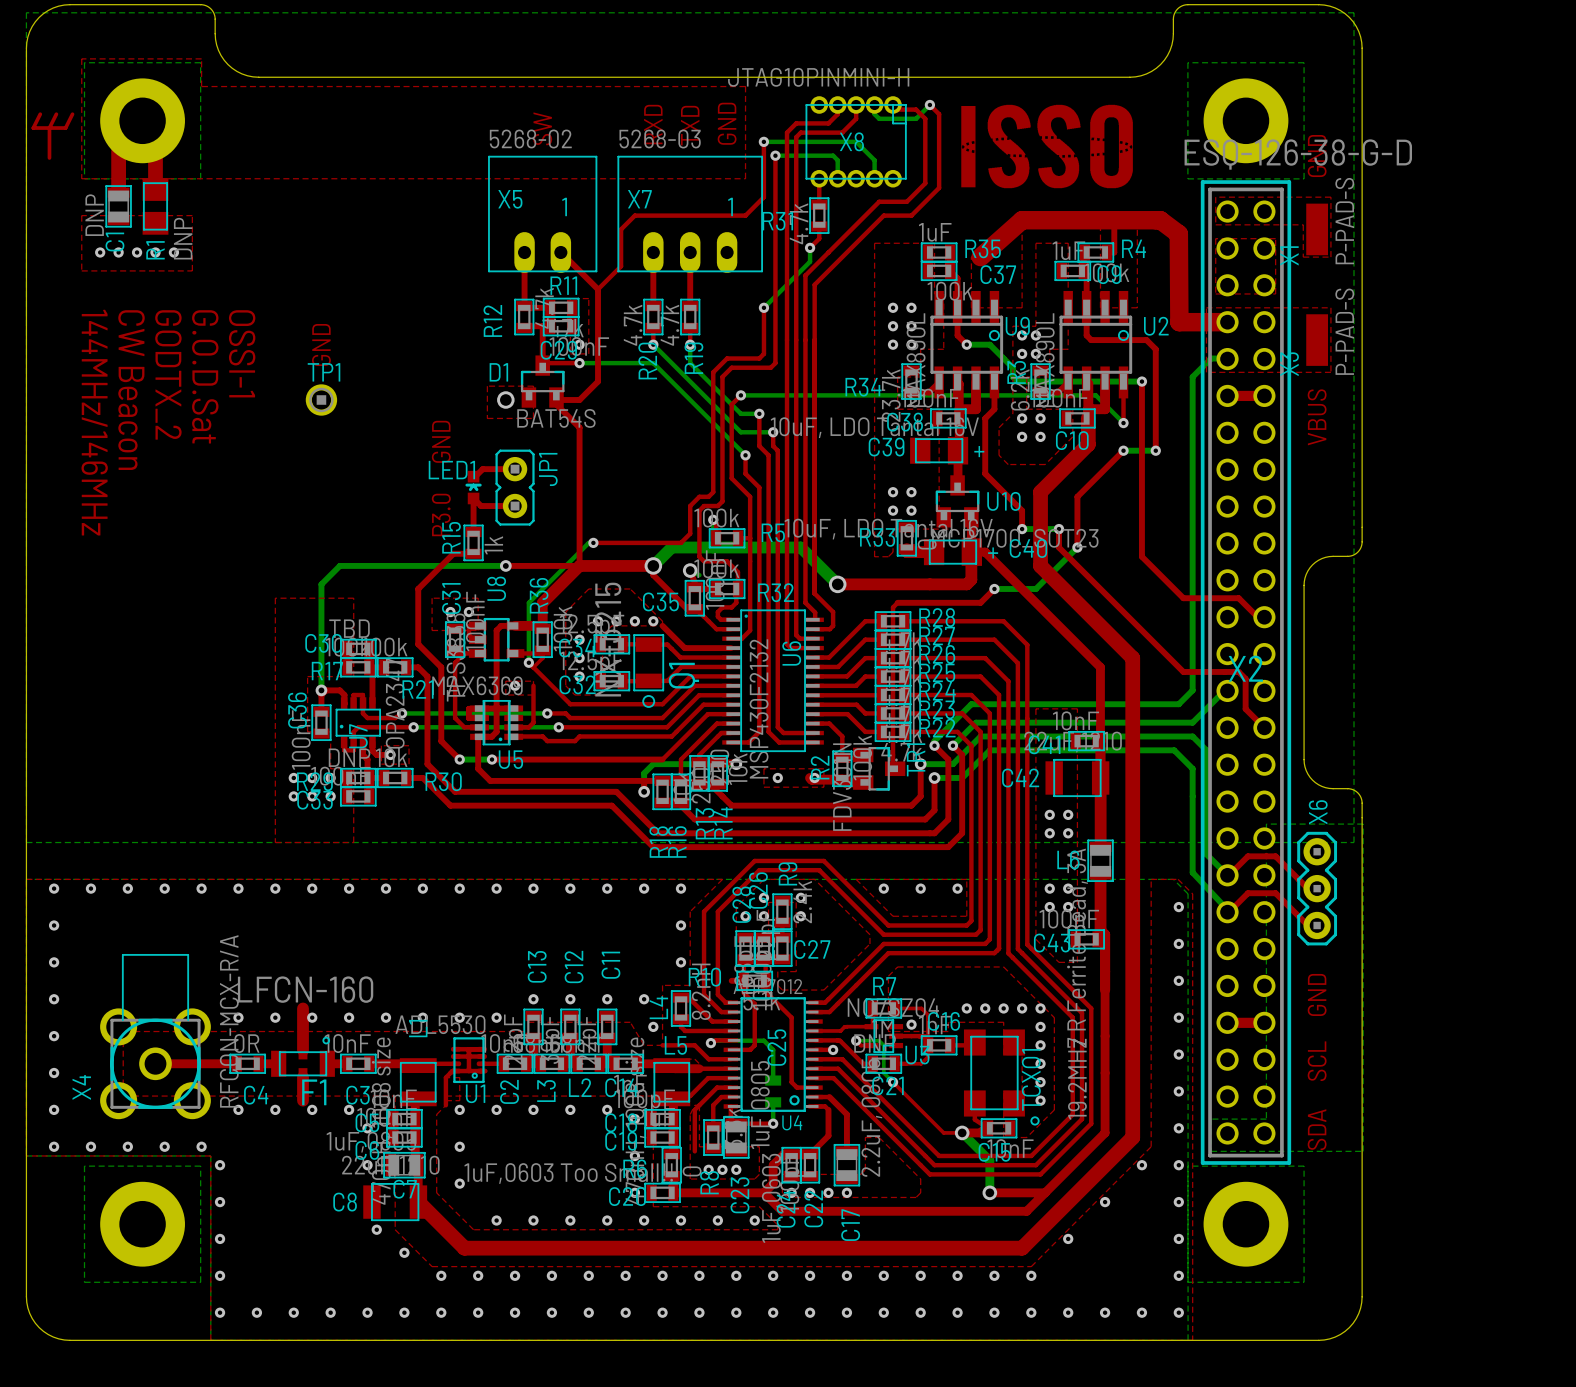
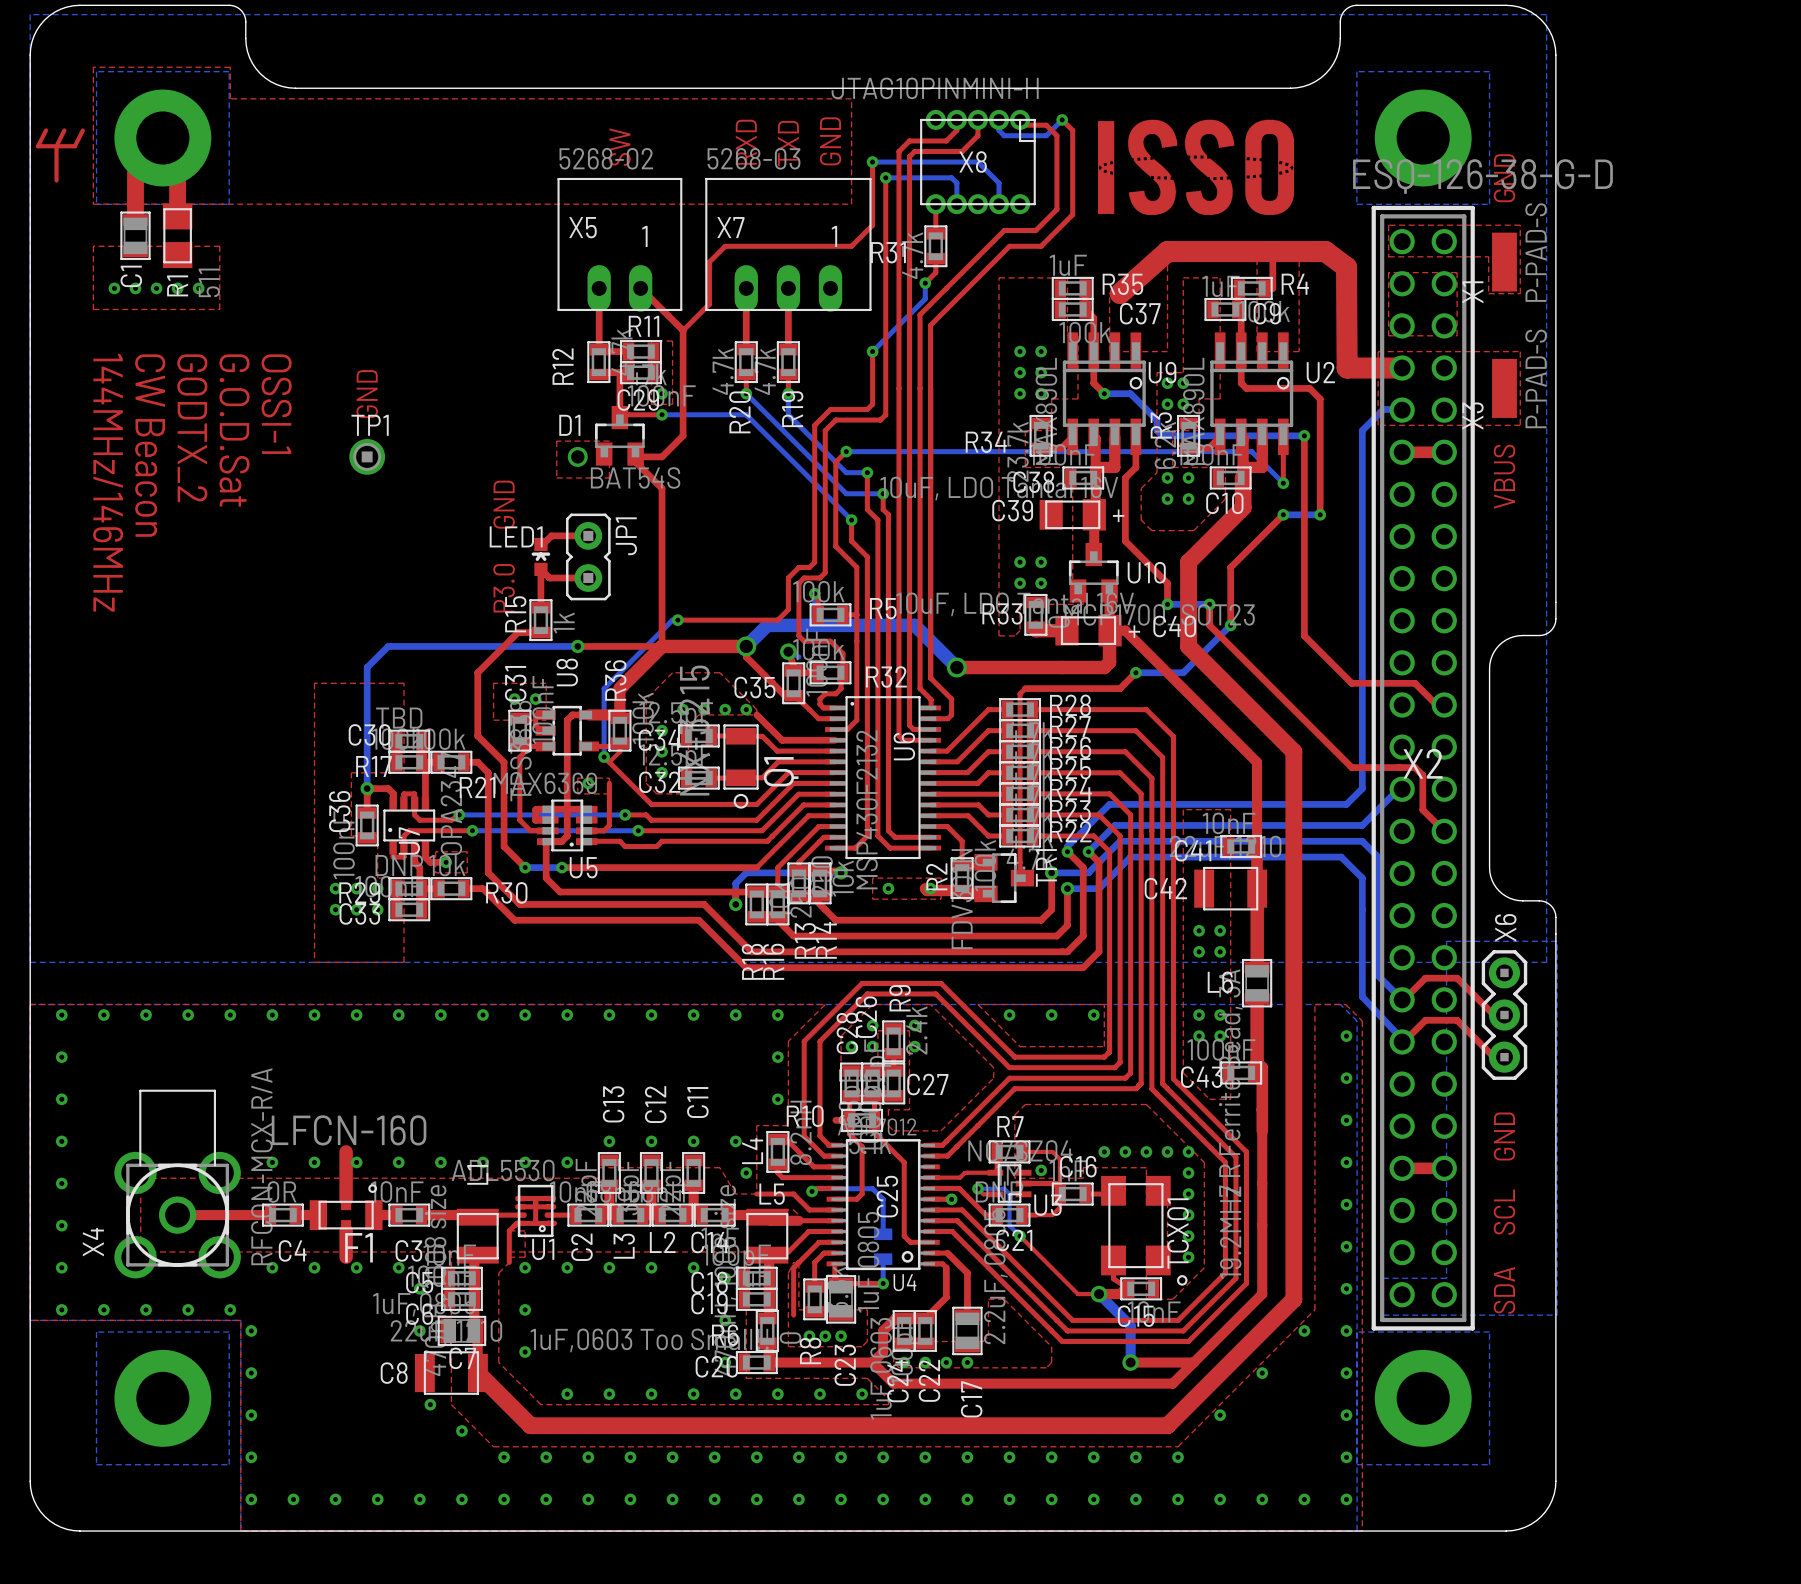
C1 value: DNP (94, 215) -> none
R1 value: DNP (183, 238) -> 511 (209, 282)

